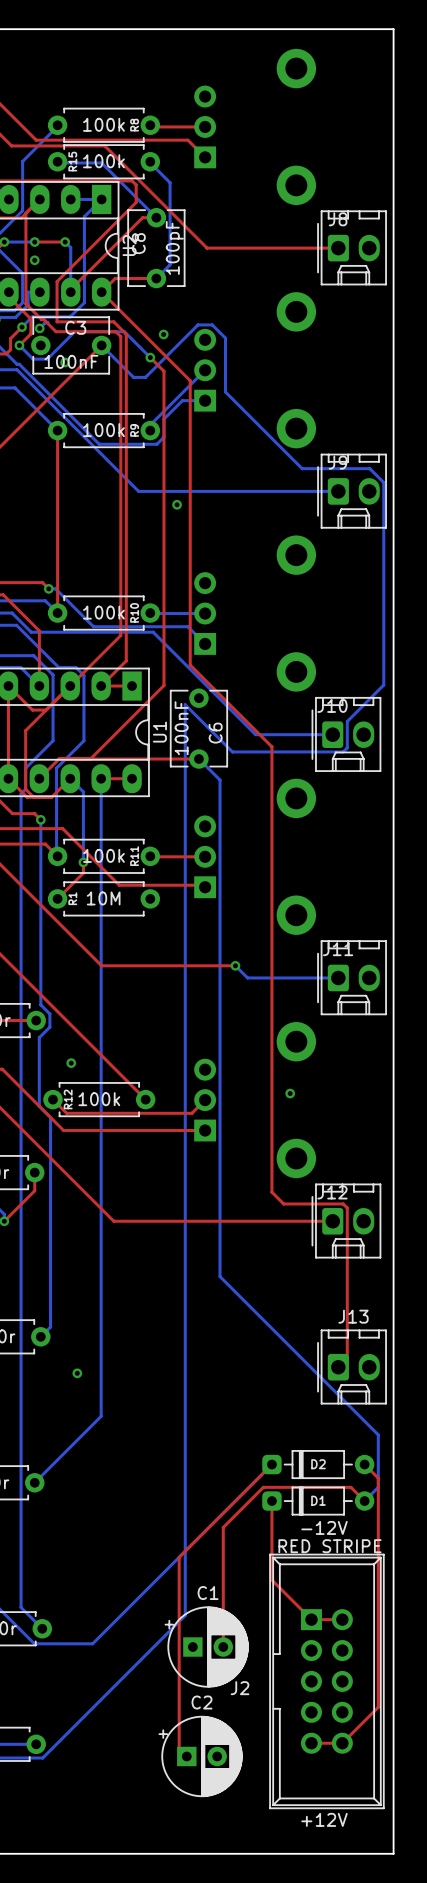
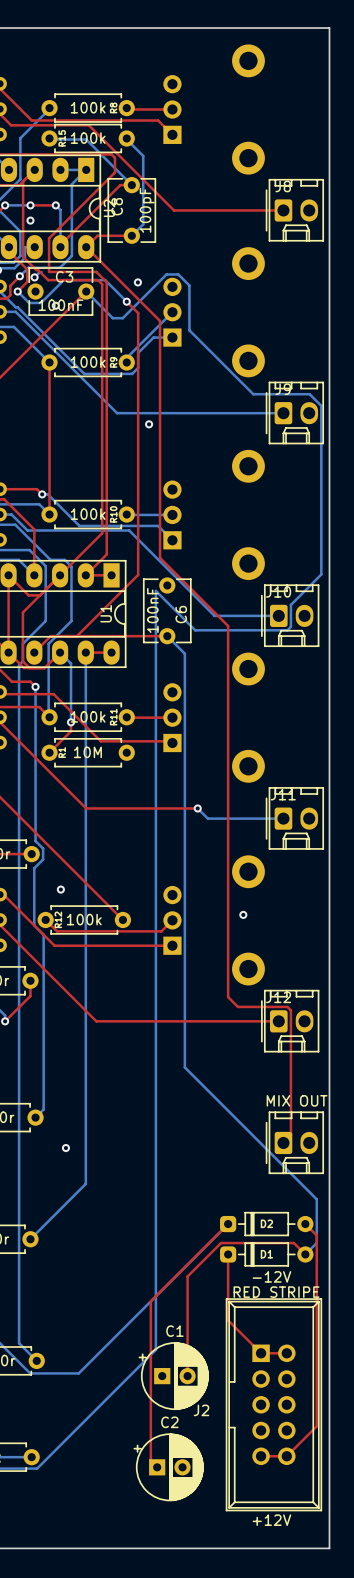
U1 name position: U1 (159, 732) -> U1 (106, 613)
J13 name: J13 (353, 1316) -> MIX OUT (297, 1100)

